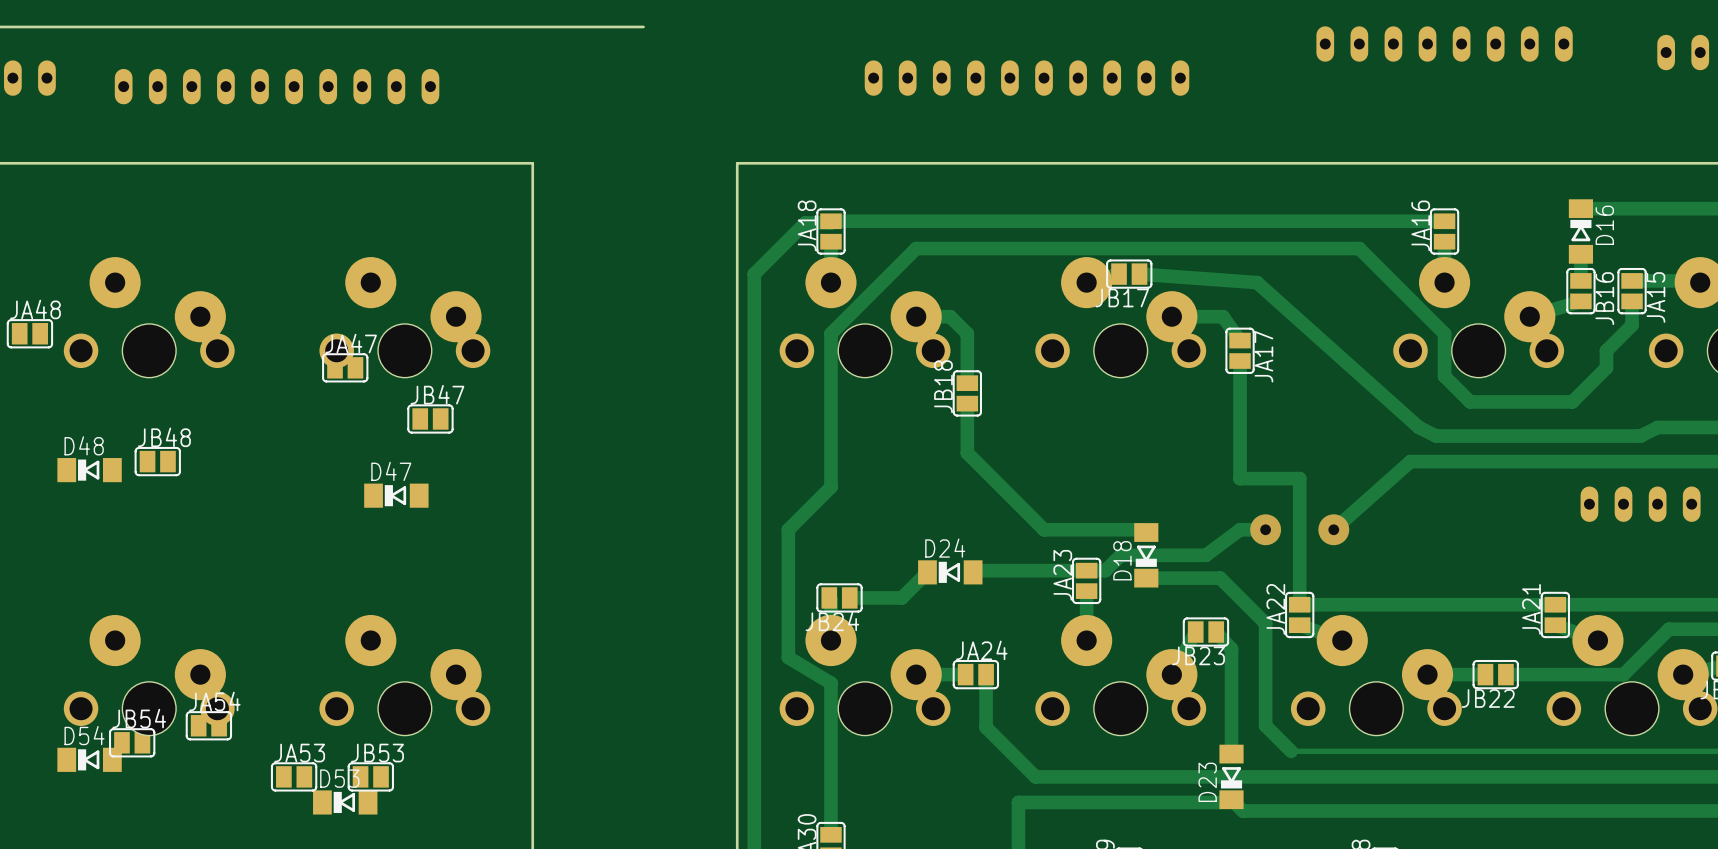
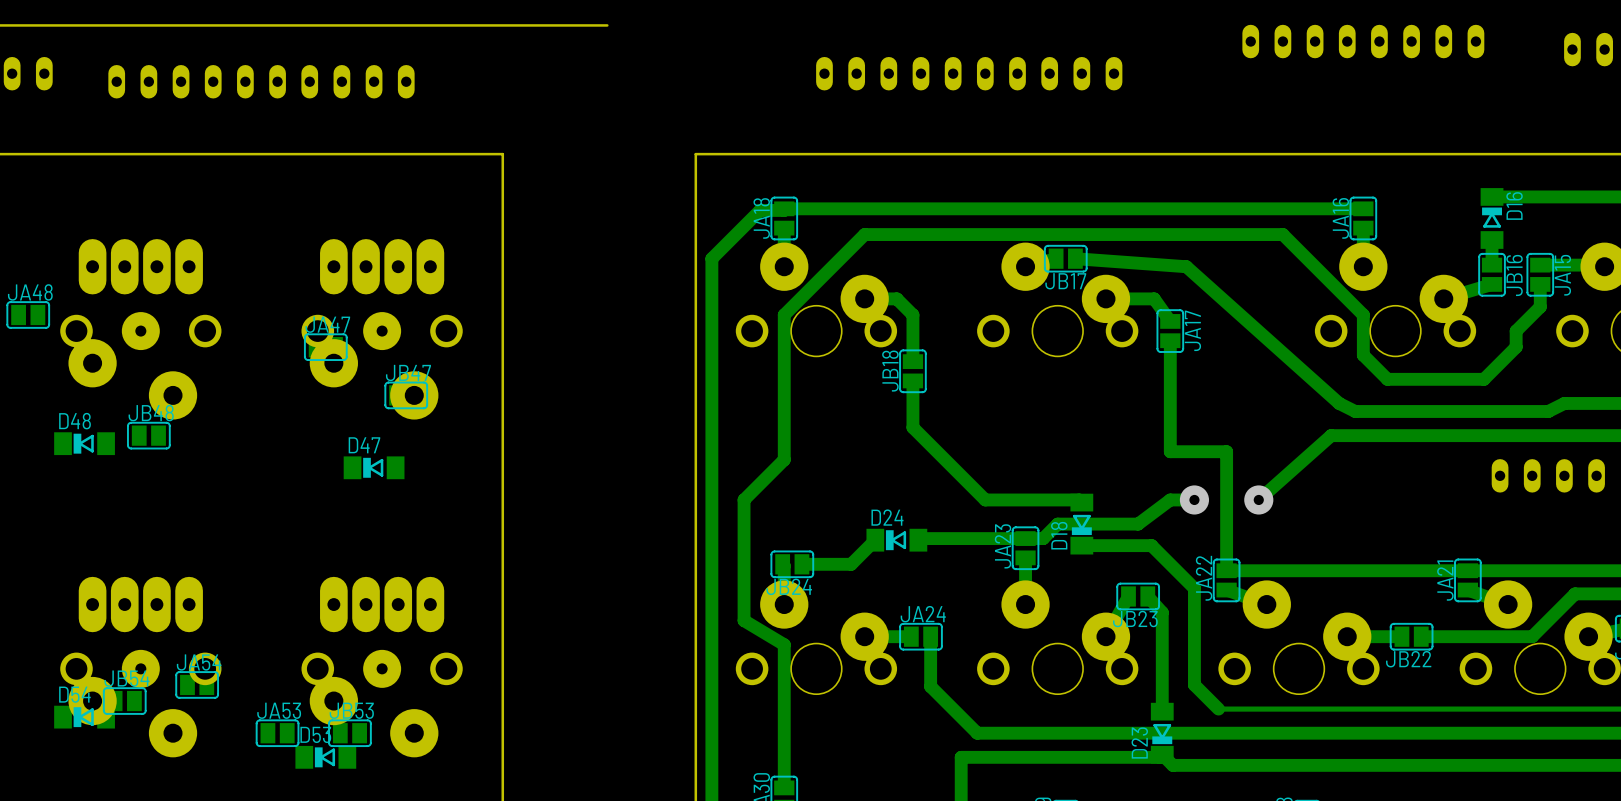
part: (149, 317) -> none
part: (404, 317) -> none
part: none -> (140, 329)
part: none -> (382, 329)
part: (149, 675) -> none
part: (404, 675) -> none
part: none -> (140, 667)
part: none -> (382, 667)

